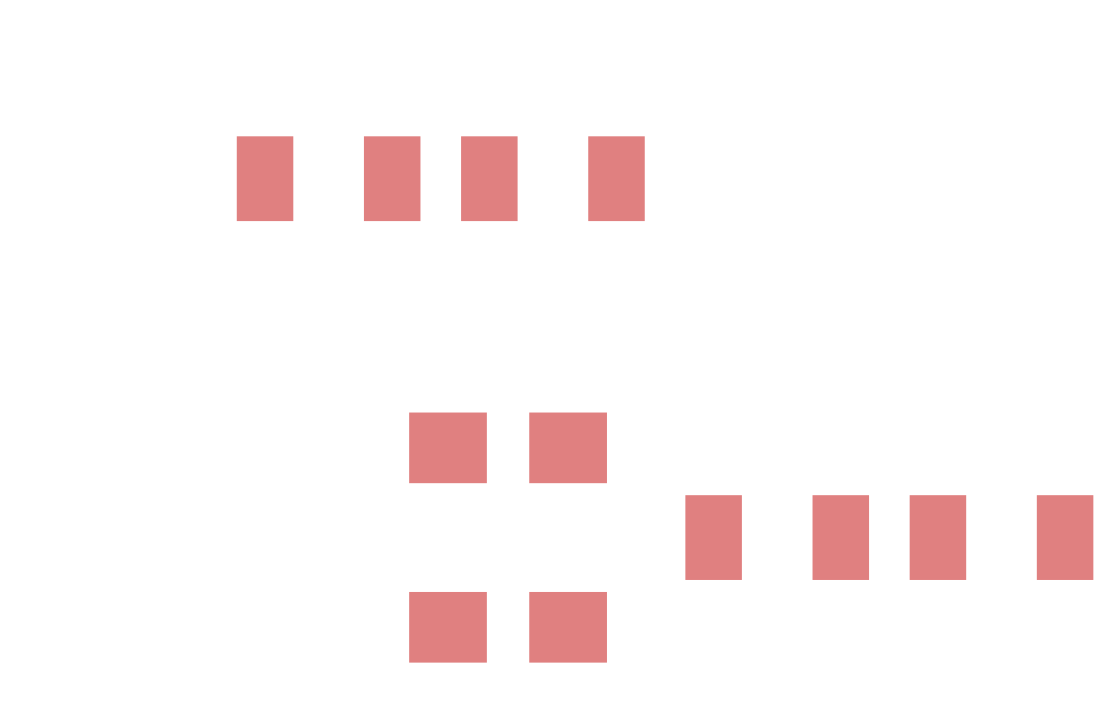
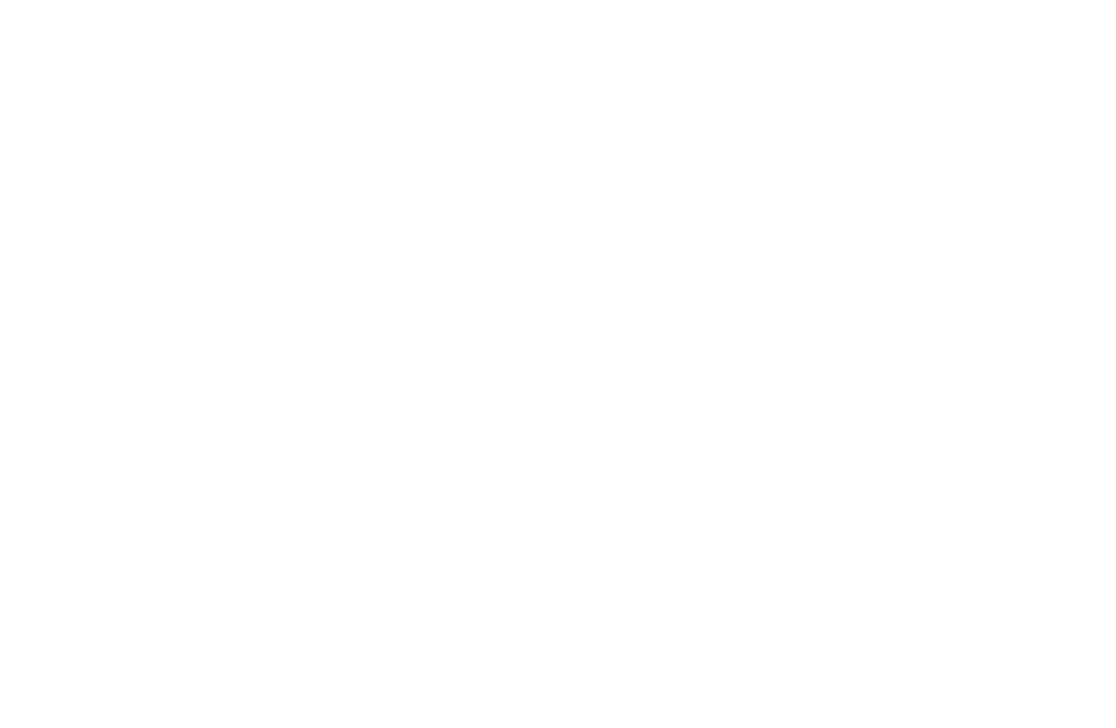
part: (328, 178) -> none
part: (552, 178) -> none
part: (508, 447) -> none
part: (777, 537) -> none
part: (1001, 537) -> none
part: (508, 627) -> none

